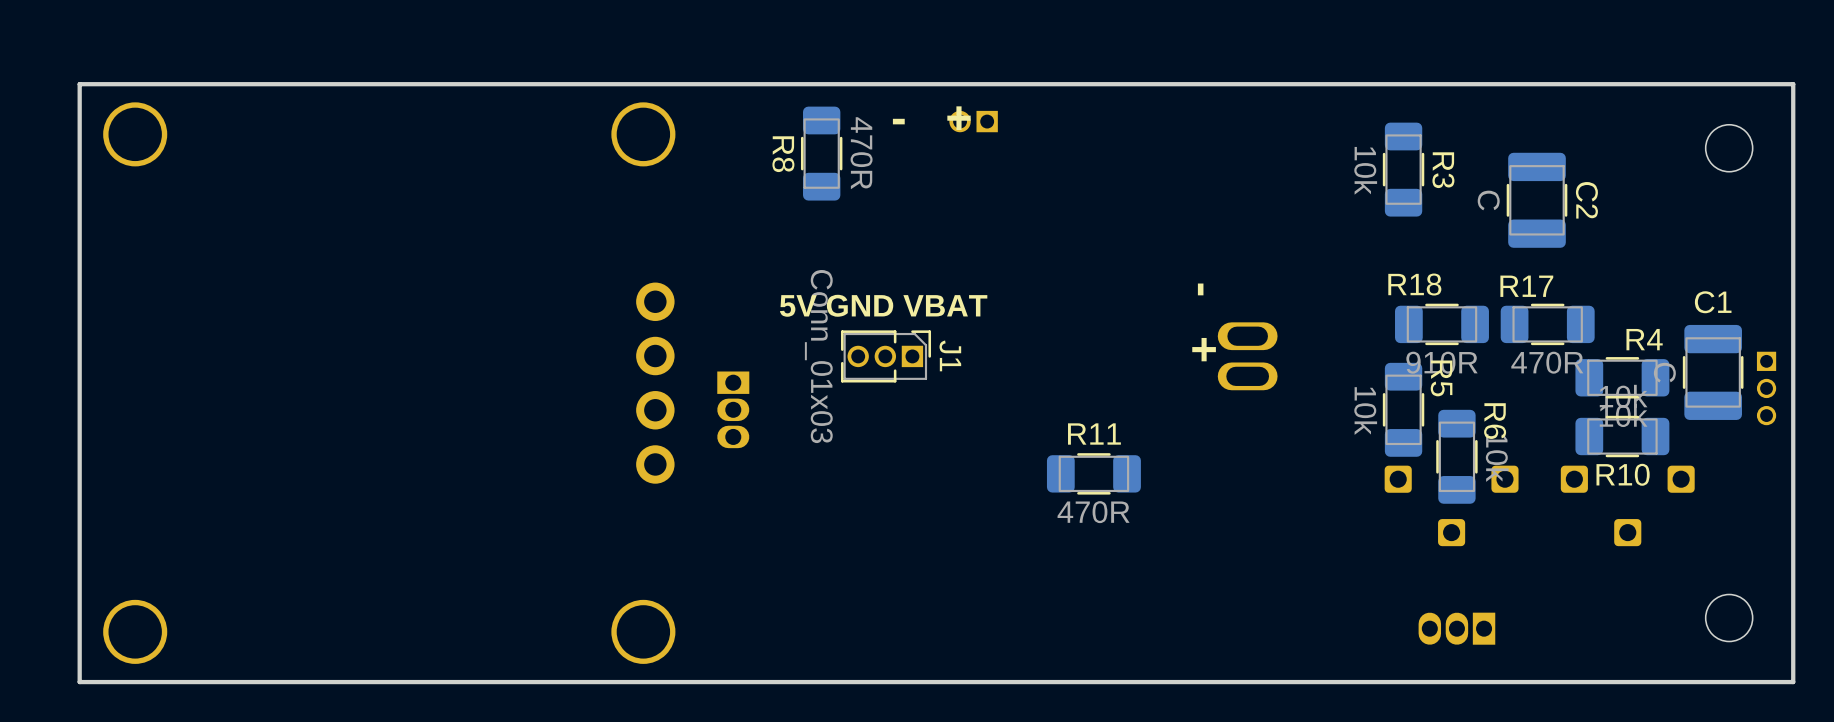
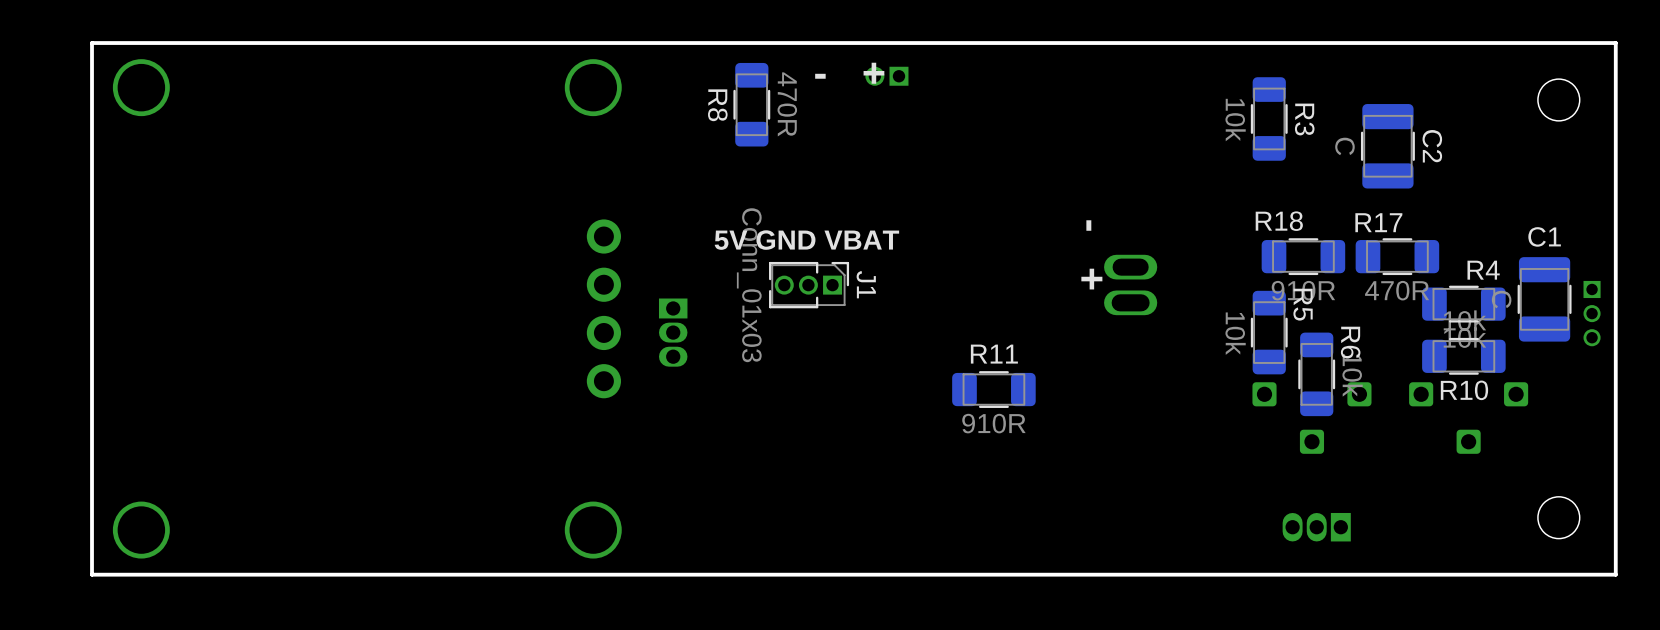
R11 value: 470R (1093, 512) -> 910R (993, 423)

